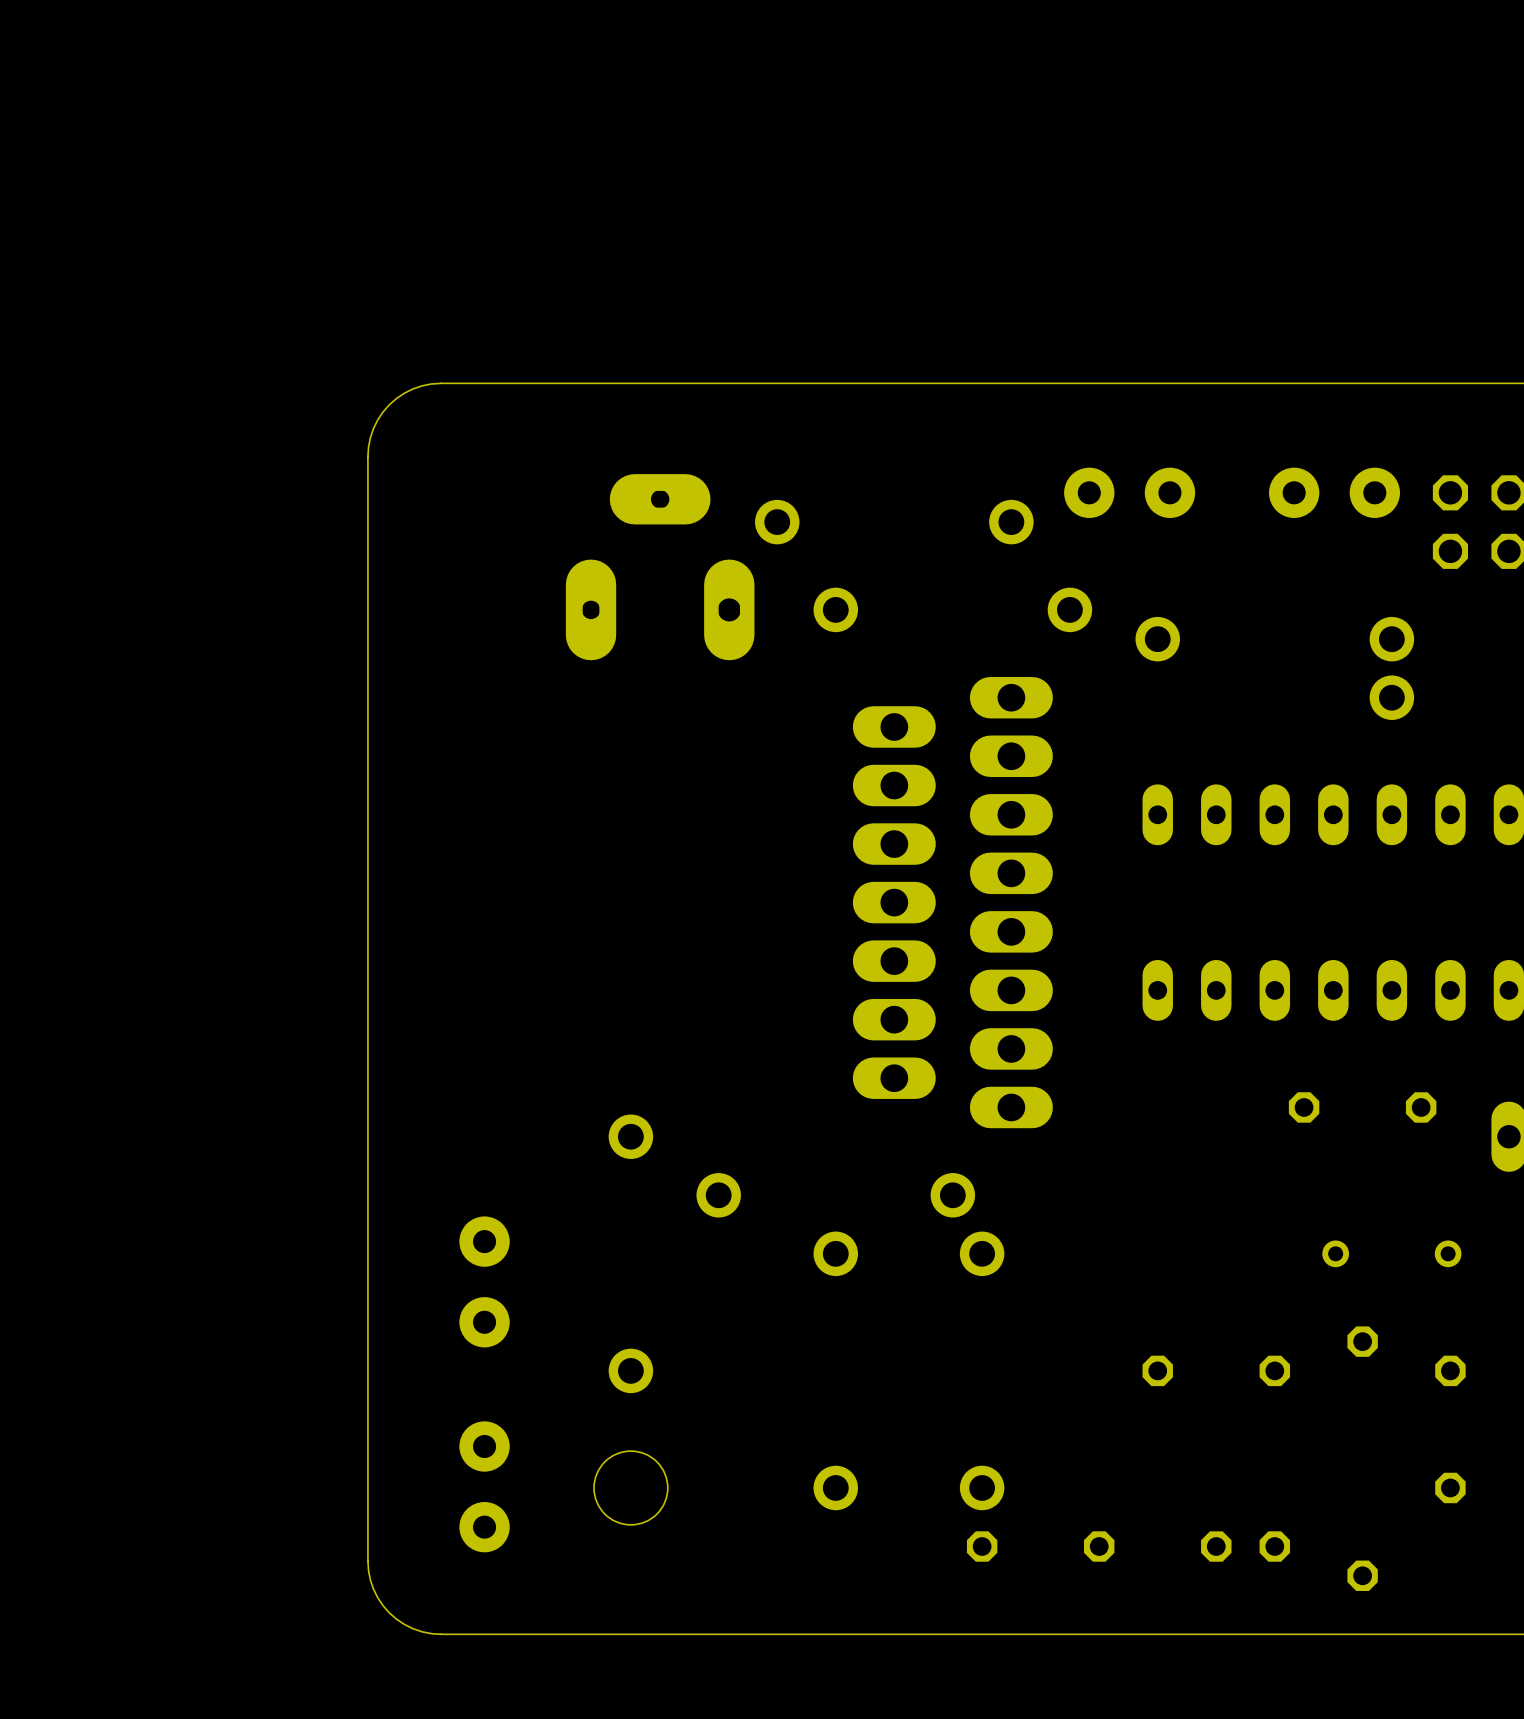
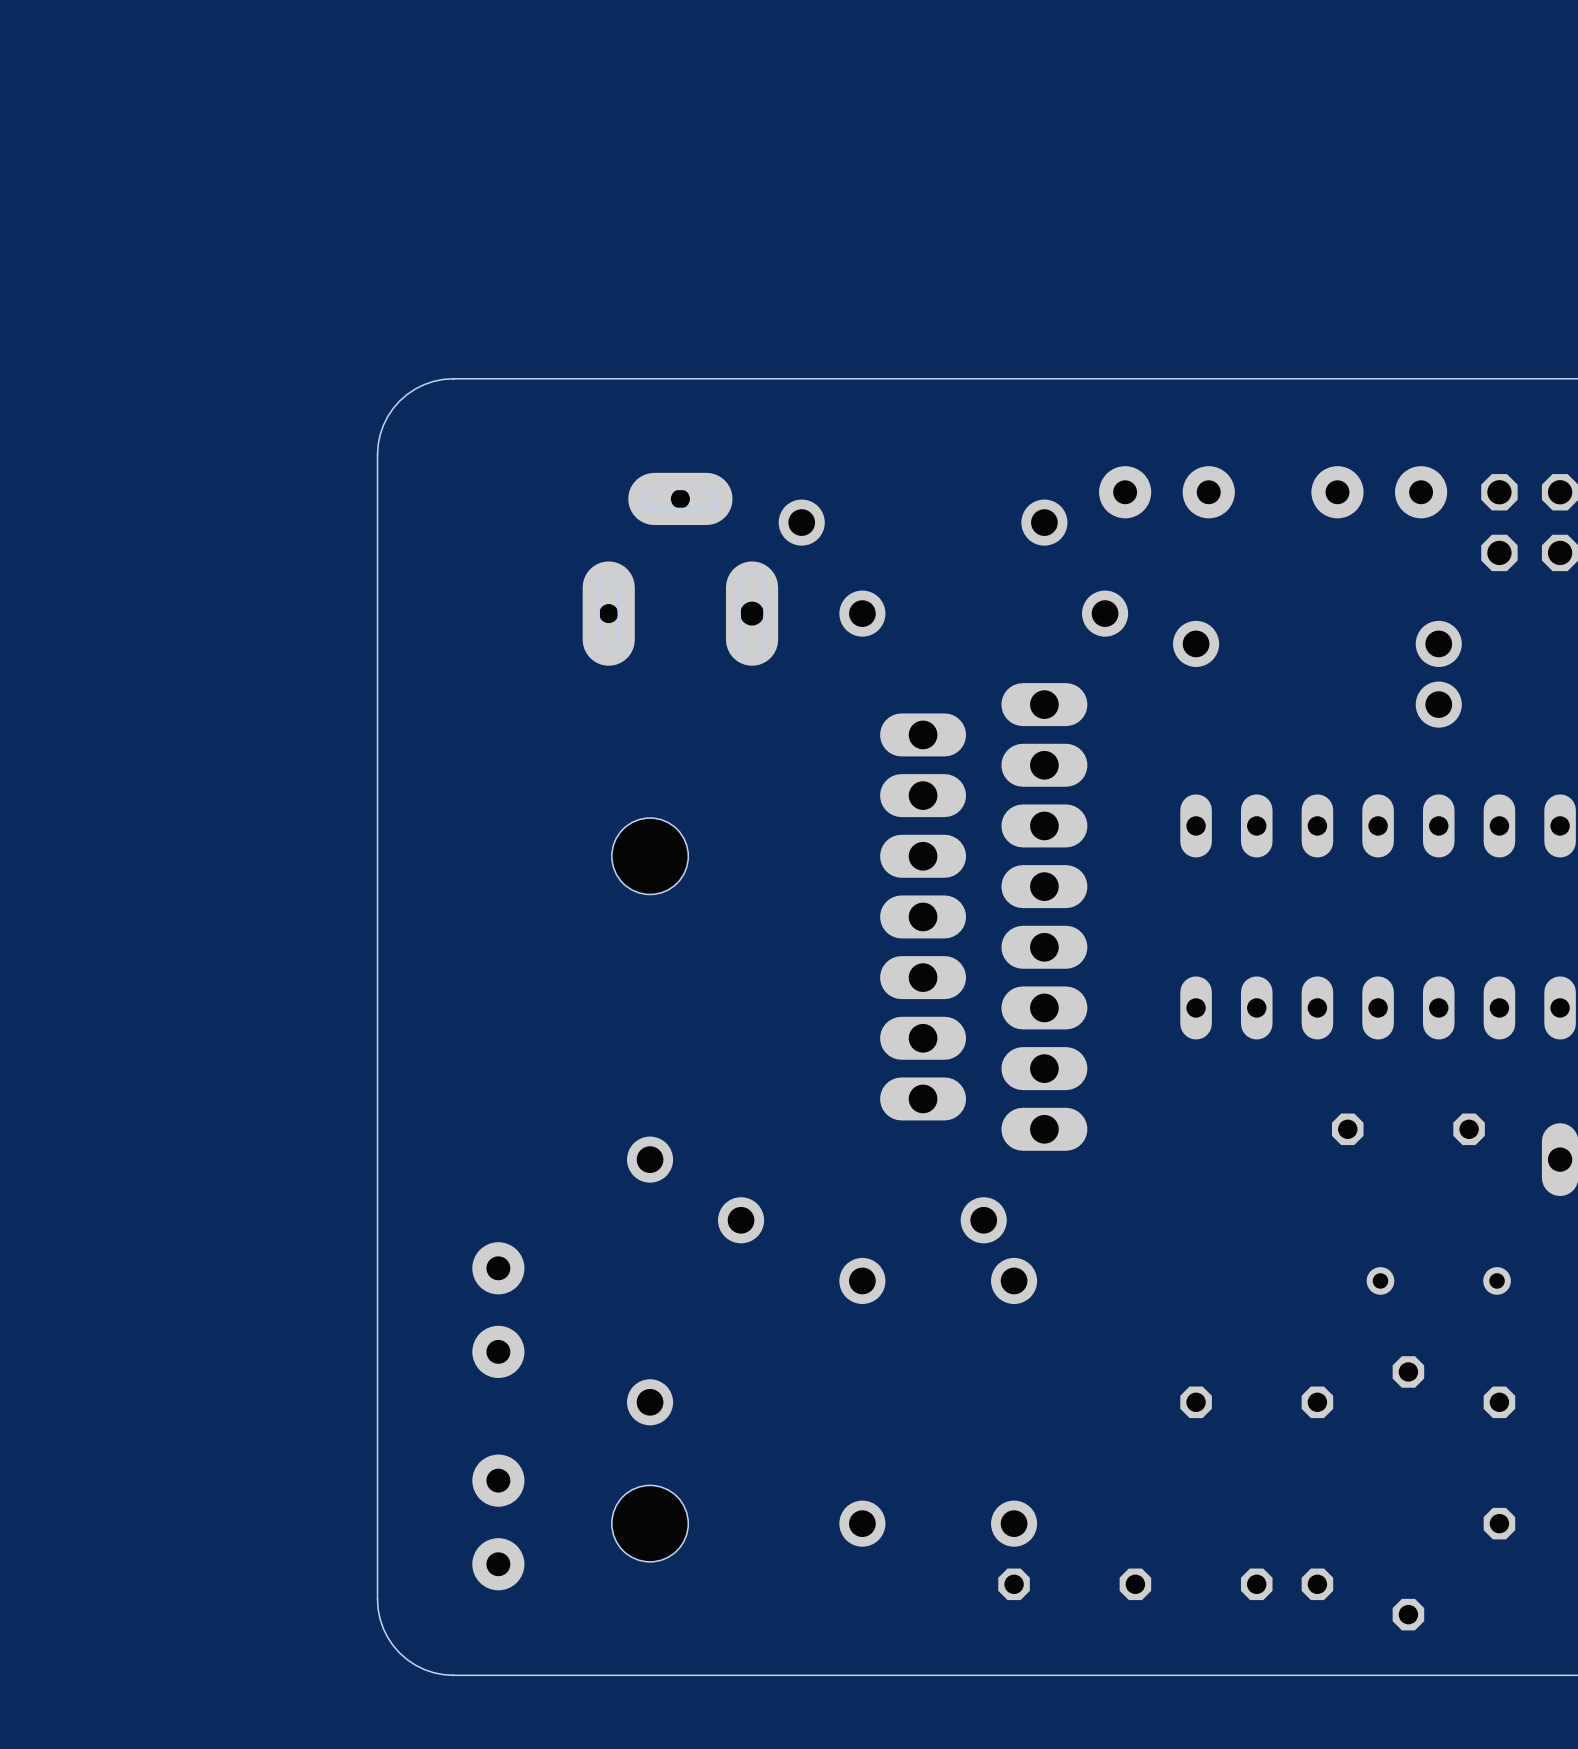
hole: none -> (650, 856)

